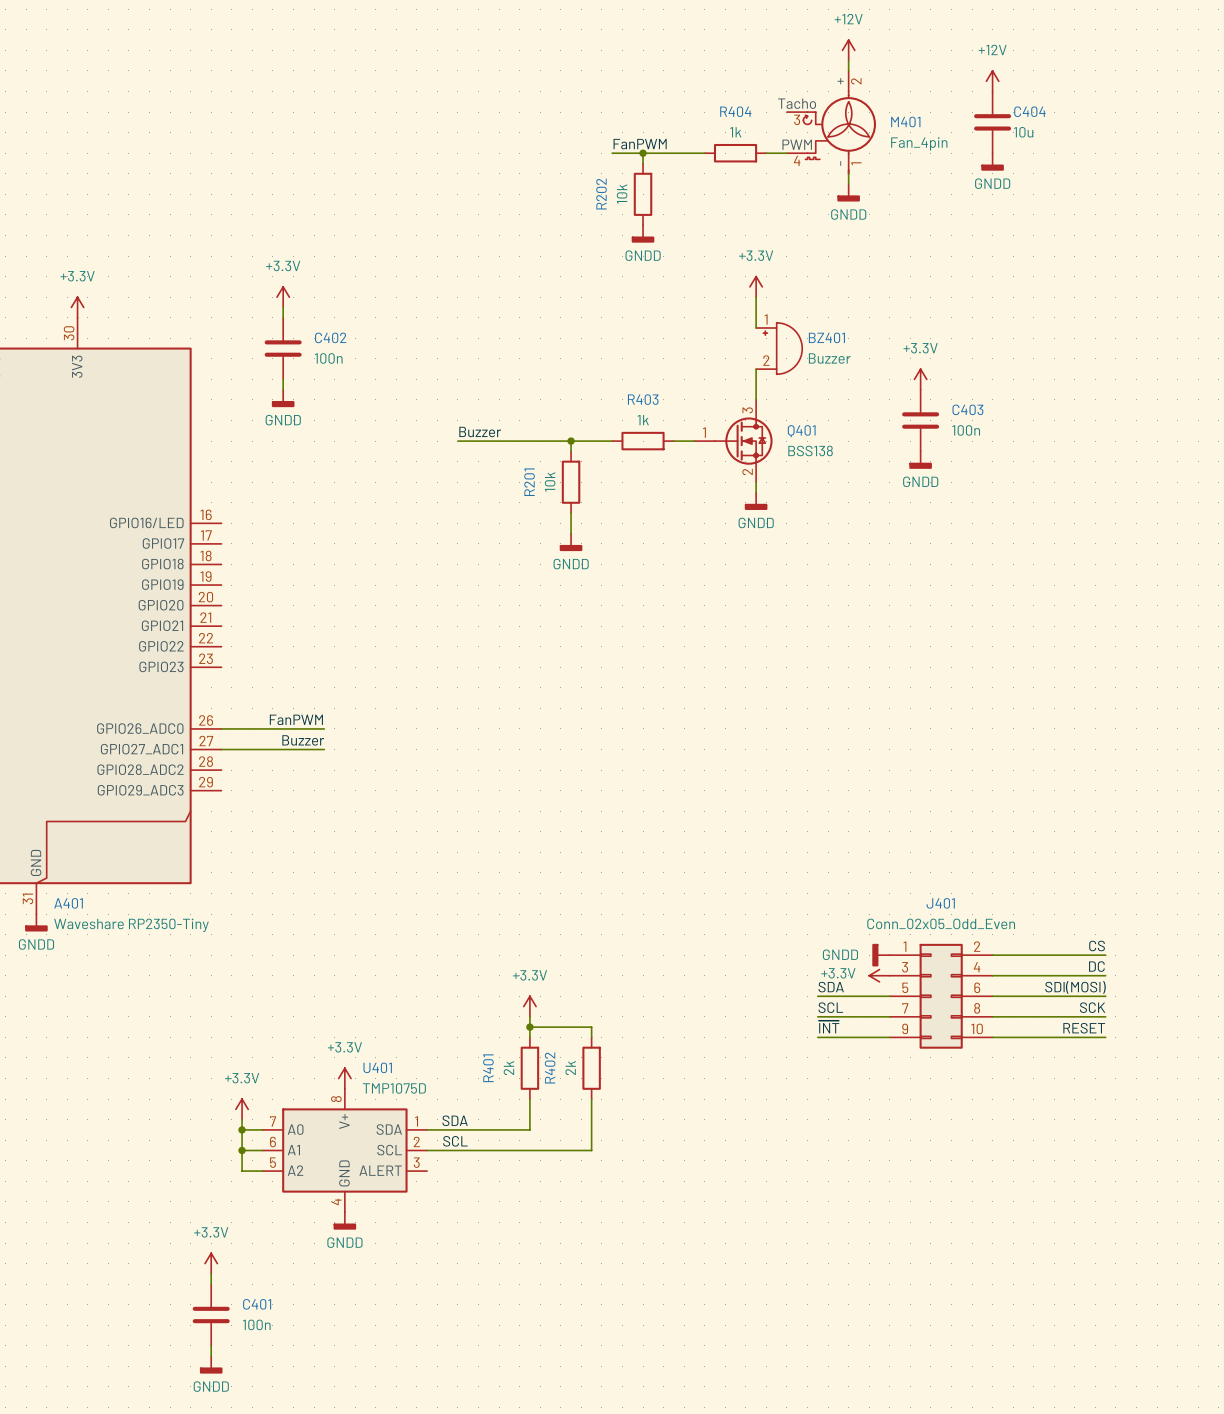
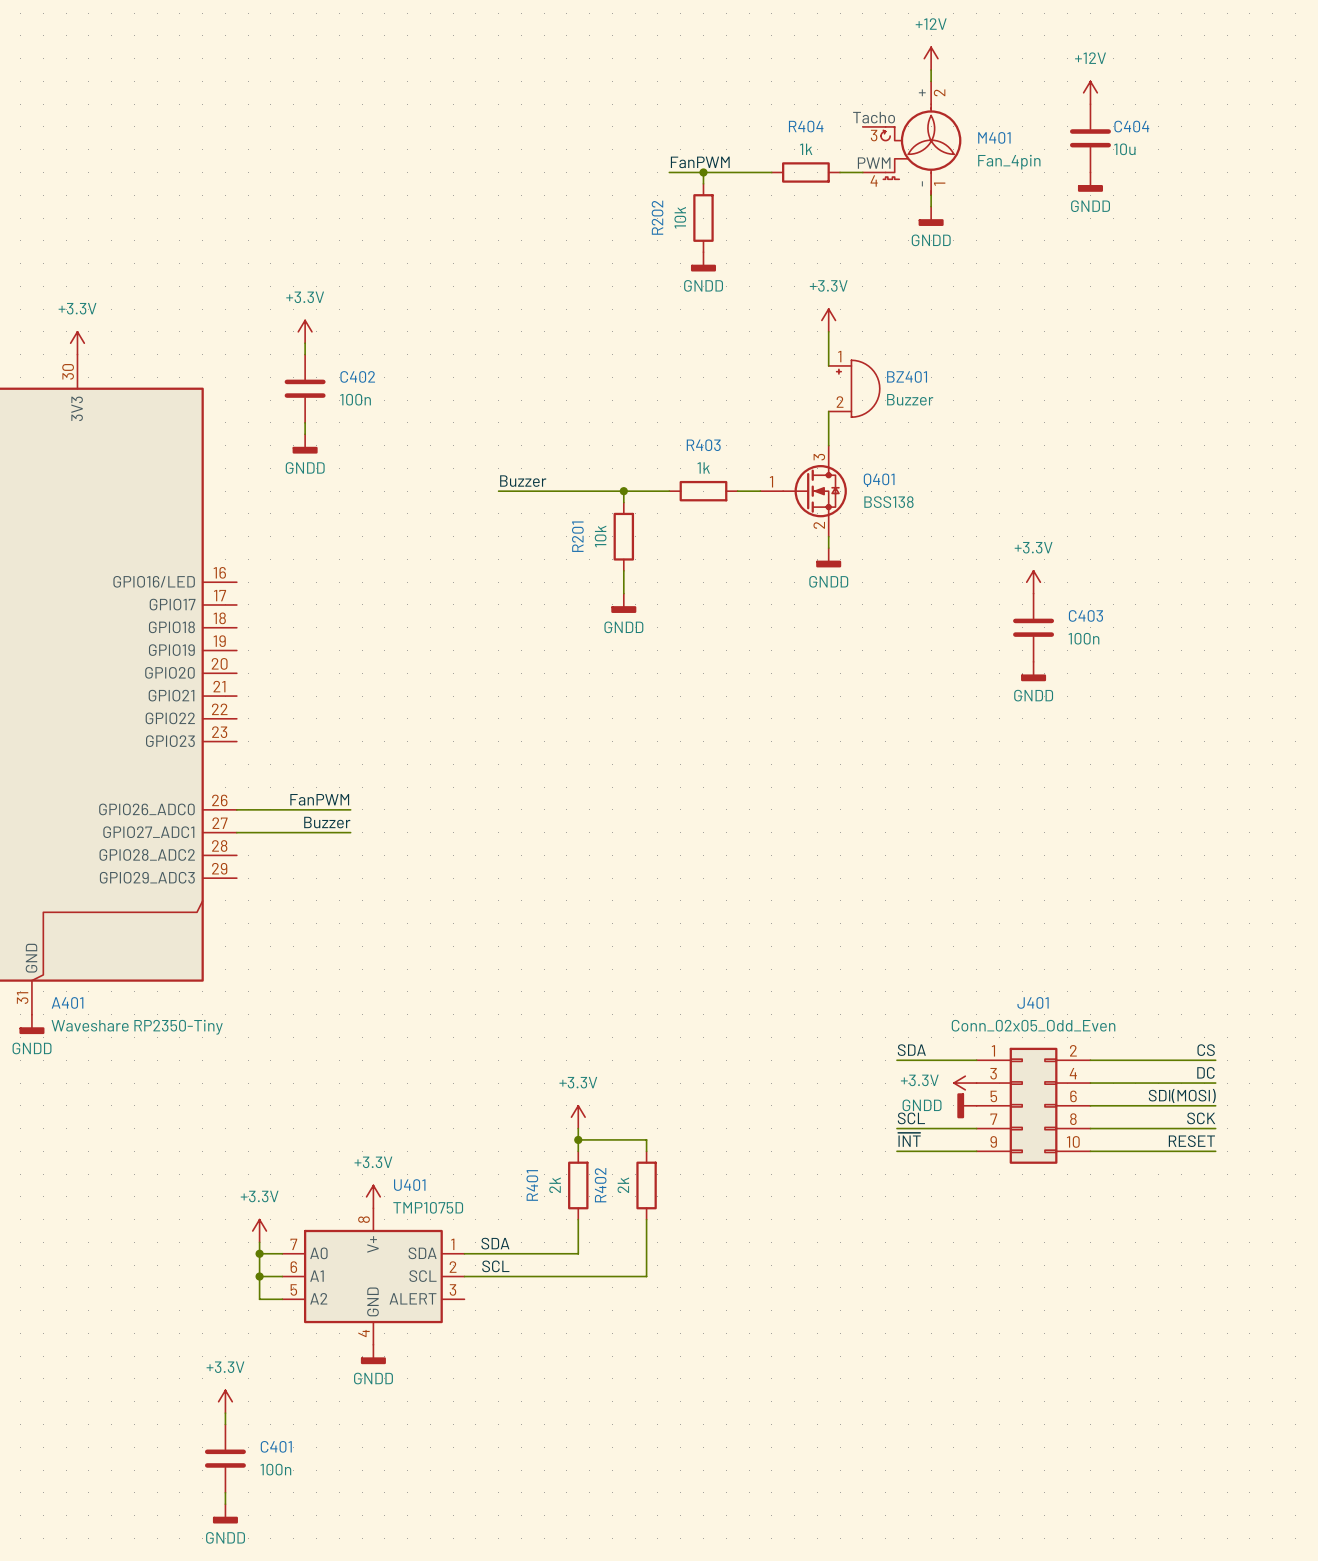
power symbol position: +3.3V (920, 379) -> +3.3V (1033, 582)
C403 position: (920, 420) -> (1033, 627)
power symbol position: GNDD (920, 460) -> GNDD (1033, 671)
power symbol position: GNDD (881, 955) -> GNDD (966, 1105)
label position: SDA (831, 987) -> SDA (911, 1050)
wire: (817, 996) (889, 996) -> (896, 1060) (976, 1060)

